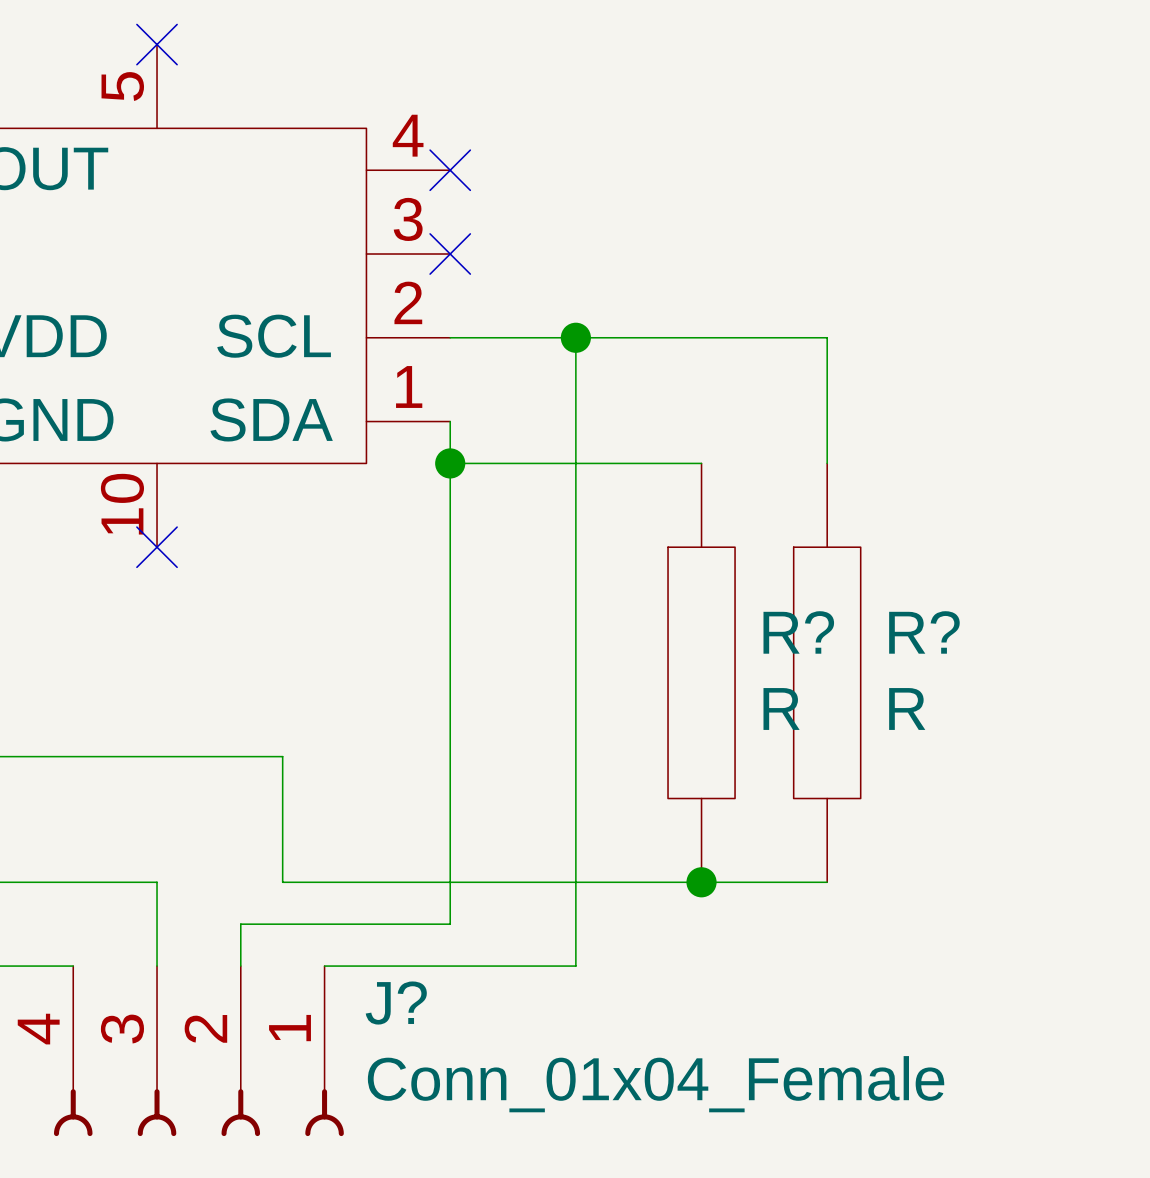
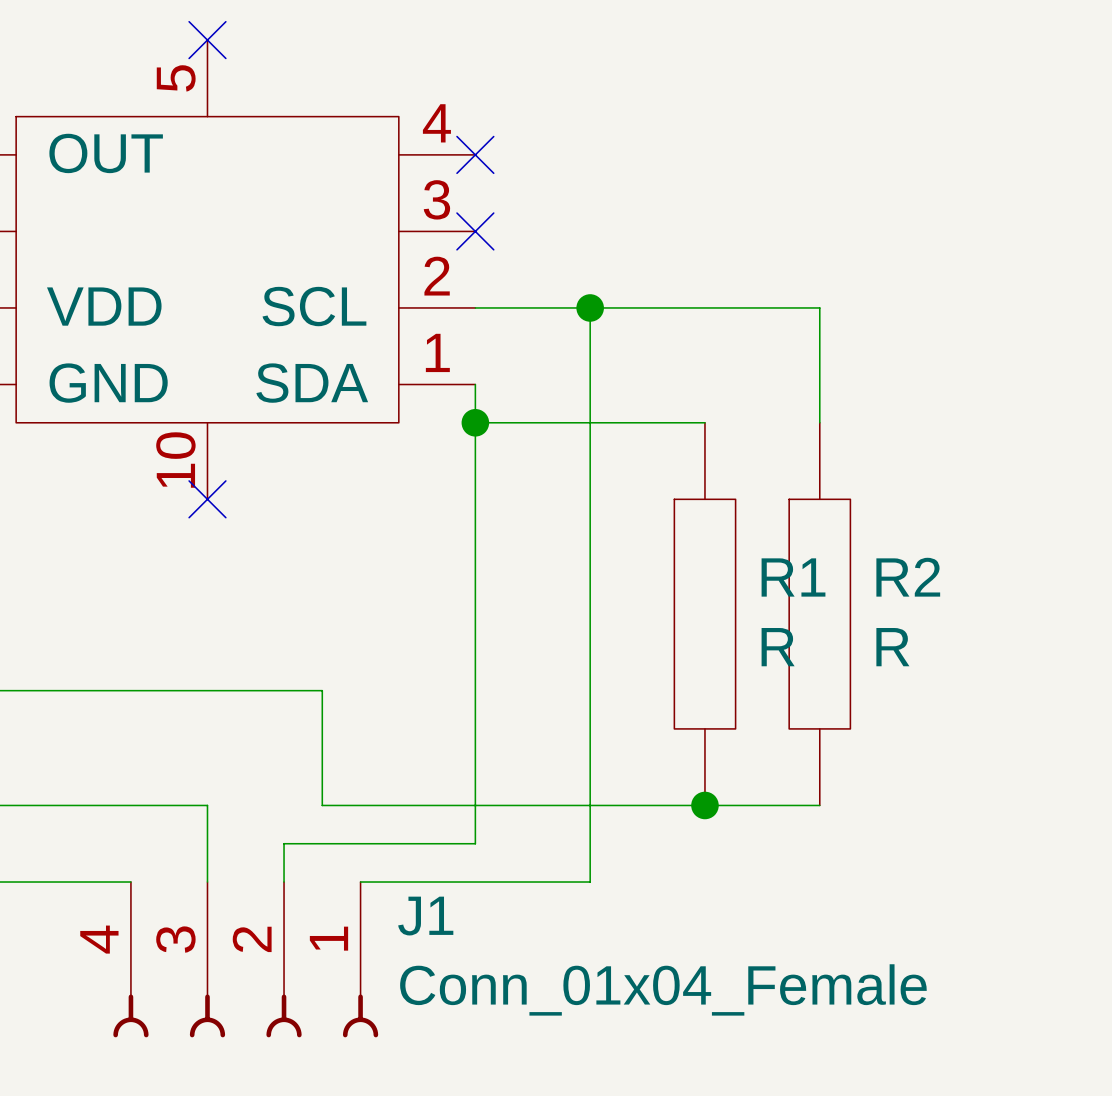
R? name: R? (798, 632) -> R1 (793, 577)
R? name: R? (924, 632) -> R2 (908, 577)
J? name: J? (396, 1003) -> J1 (425, 916)

